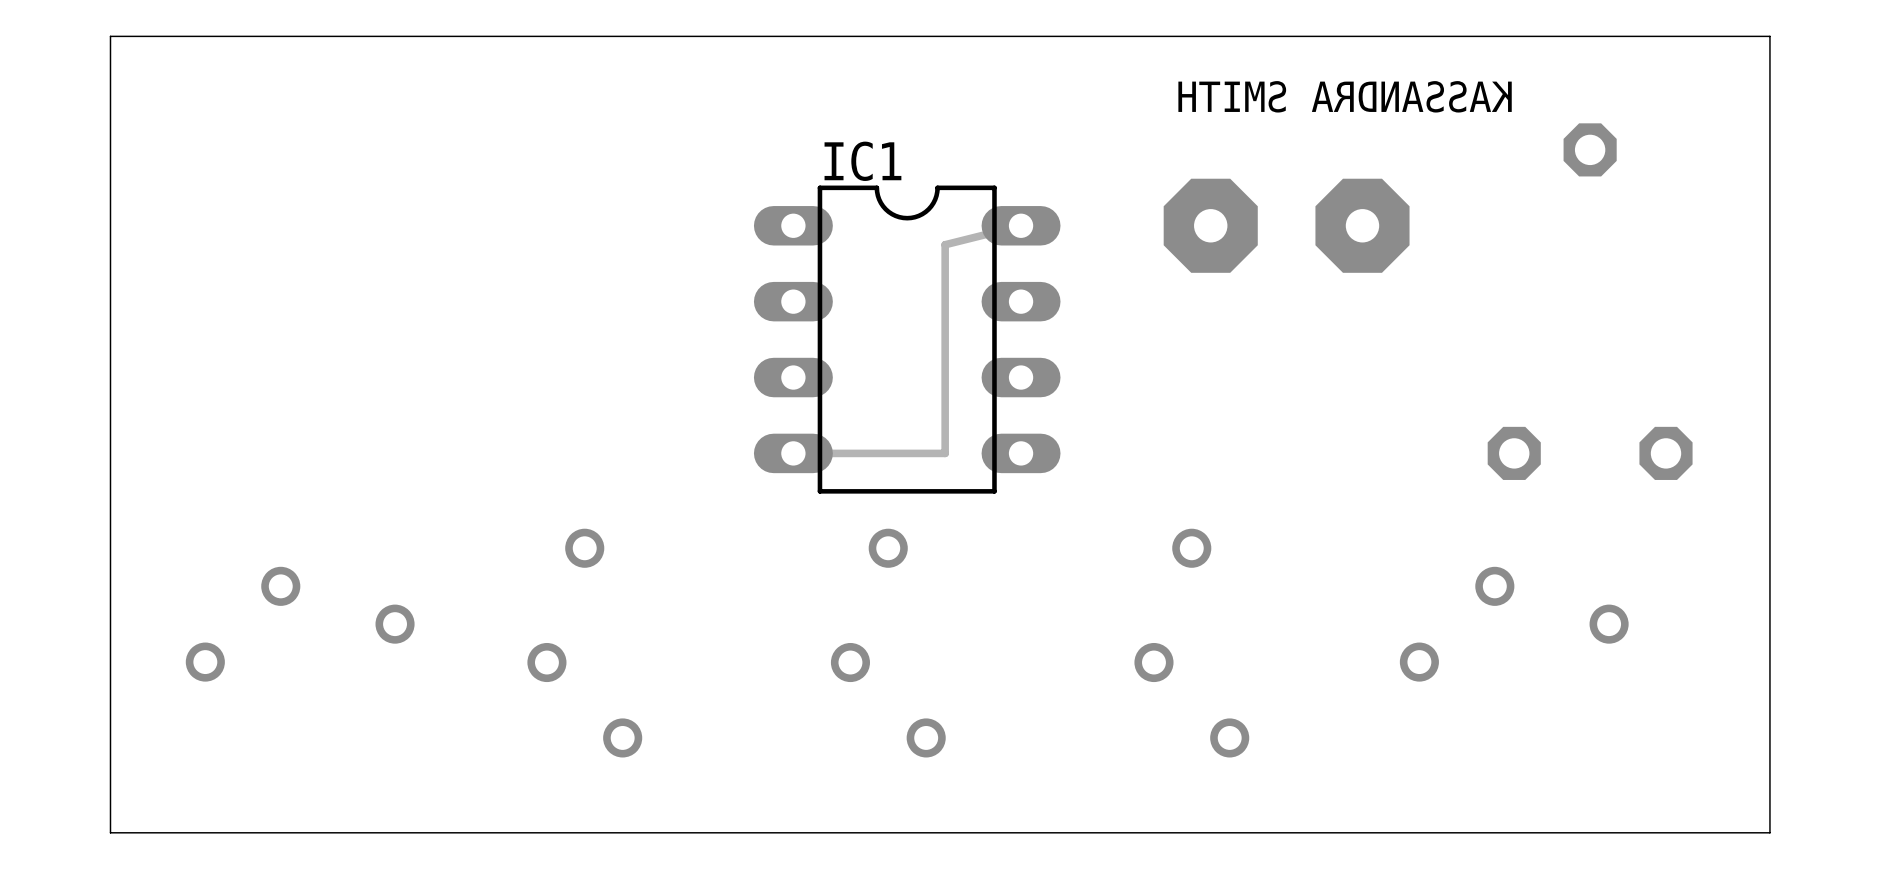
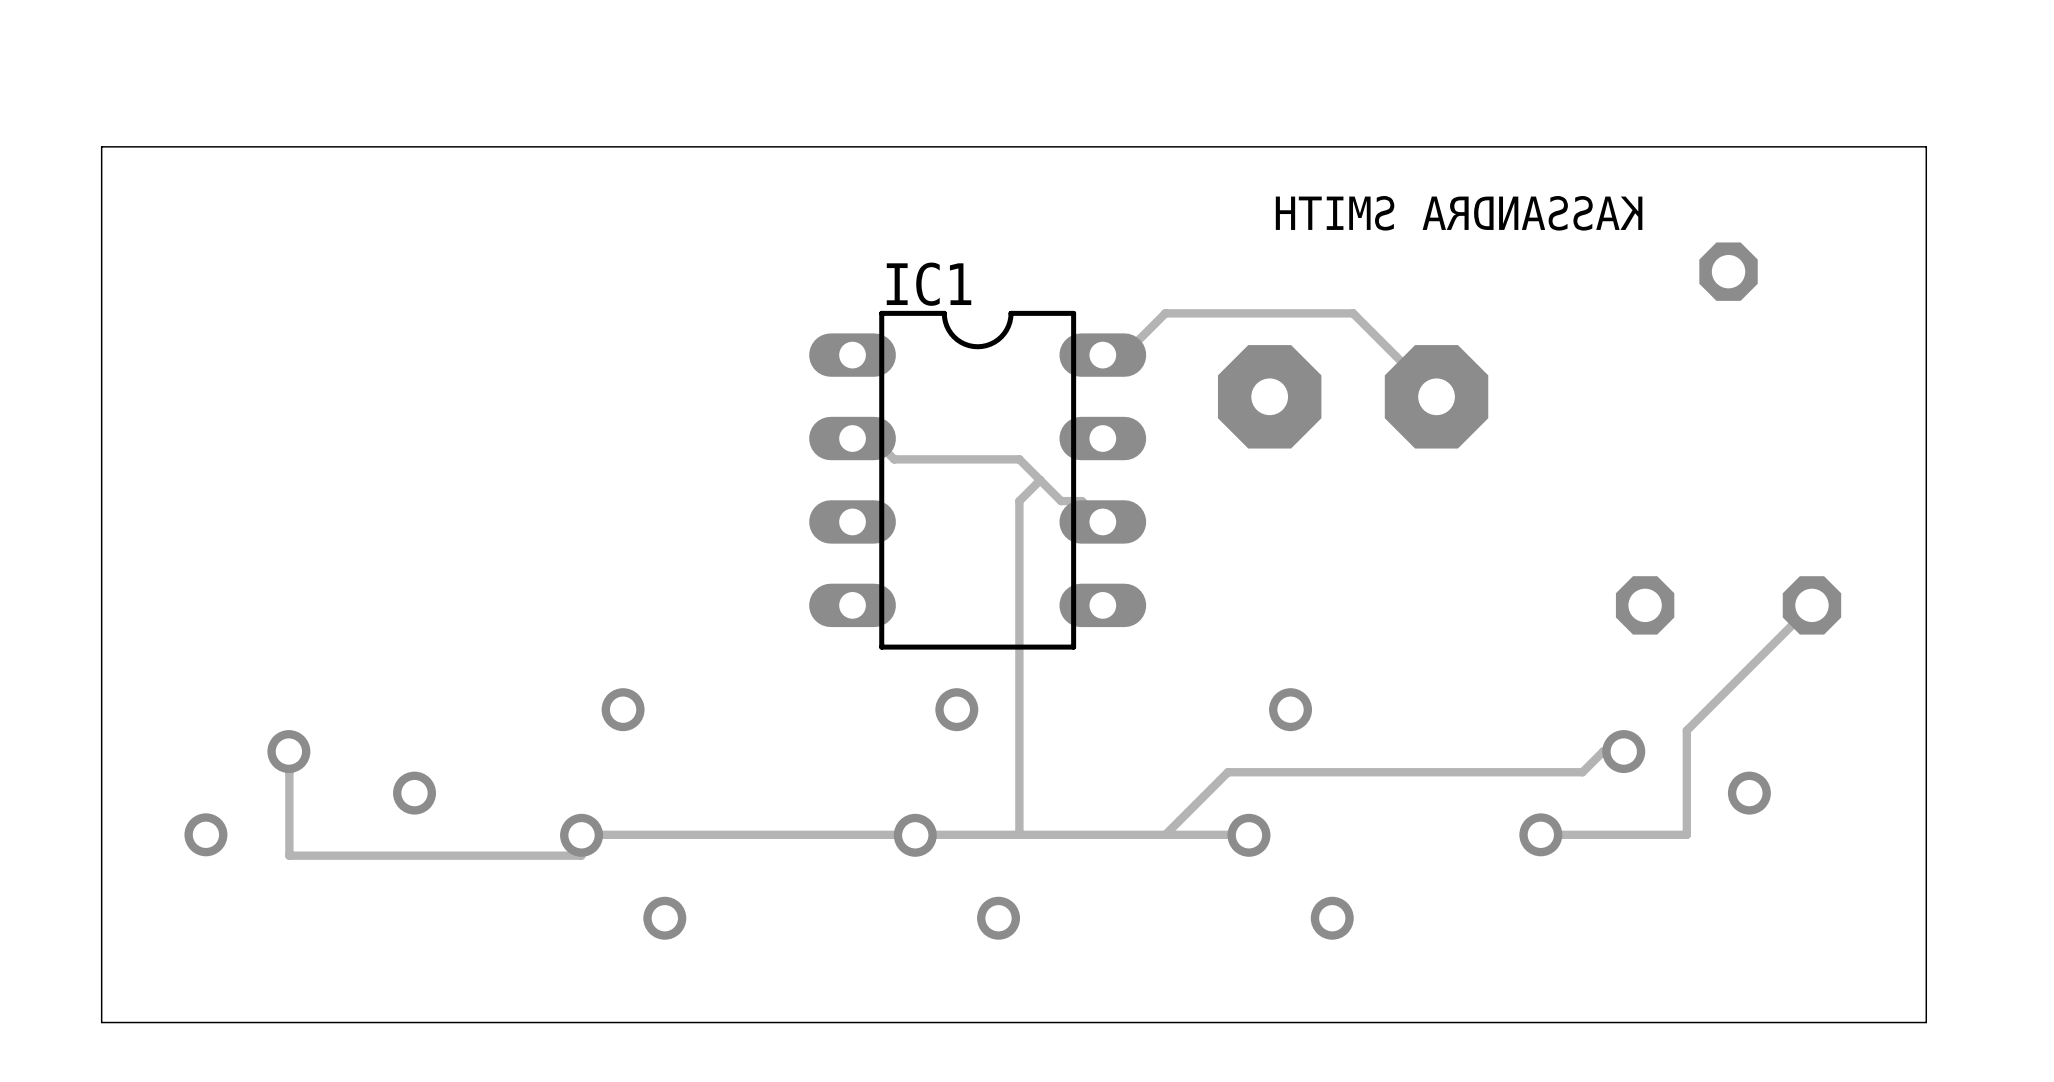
track: (1021, 225) (945, 244) (945, 358) -> (1040, 480) (1019, 501)
track: none -> (1102, 355) (1123, 355) (1165, 313) (1353, 313) (1436, 396)
part position: (1286, 225) -> (1353, 396)
track: none -> (852, 438) (873, 438) (894, 459) (1019, 459) (1061, 501) (1081, 501) (1102, 521)
track: (793, 453) (945, 453) -> (1019, 834) (1019, 605)
track: none -> (1811, 605) (1686, 730) (1686, 834) (1540, 834)
track: none -> (288, 751) (289, 855) (581, 855) (581, 835) (915, 834)
track: none -> (1623, 751) (1603, 751) (1582, 772) (1227, 772) (1165, 834)
track: none -> (1248, 834) (915, 835)

